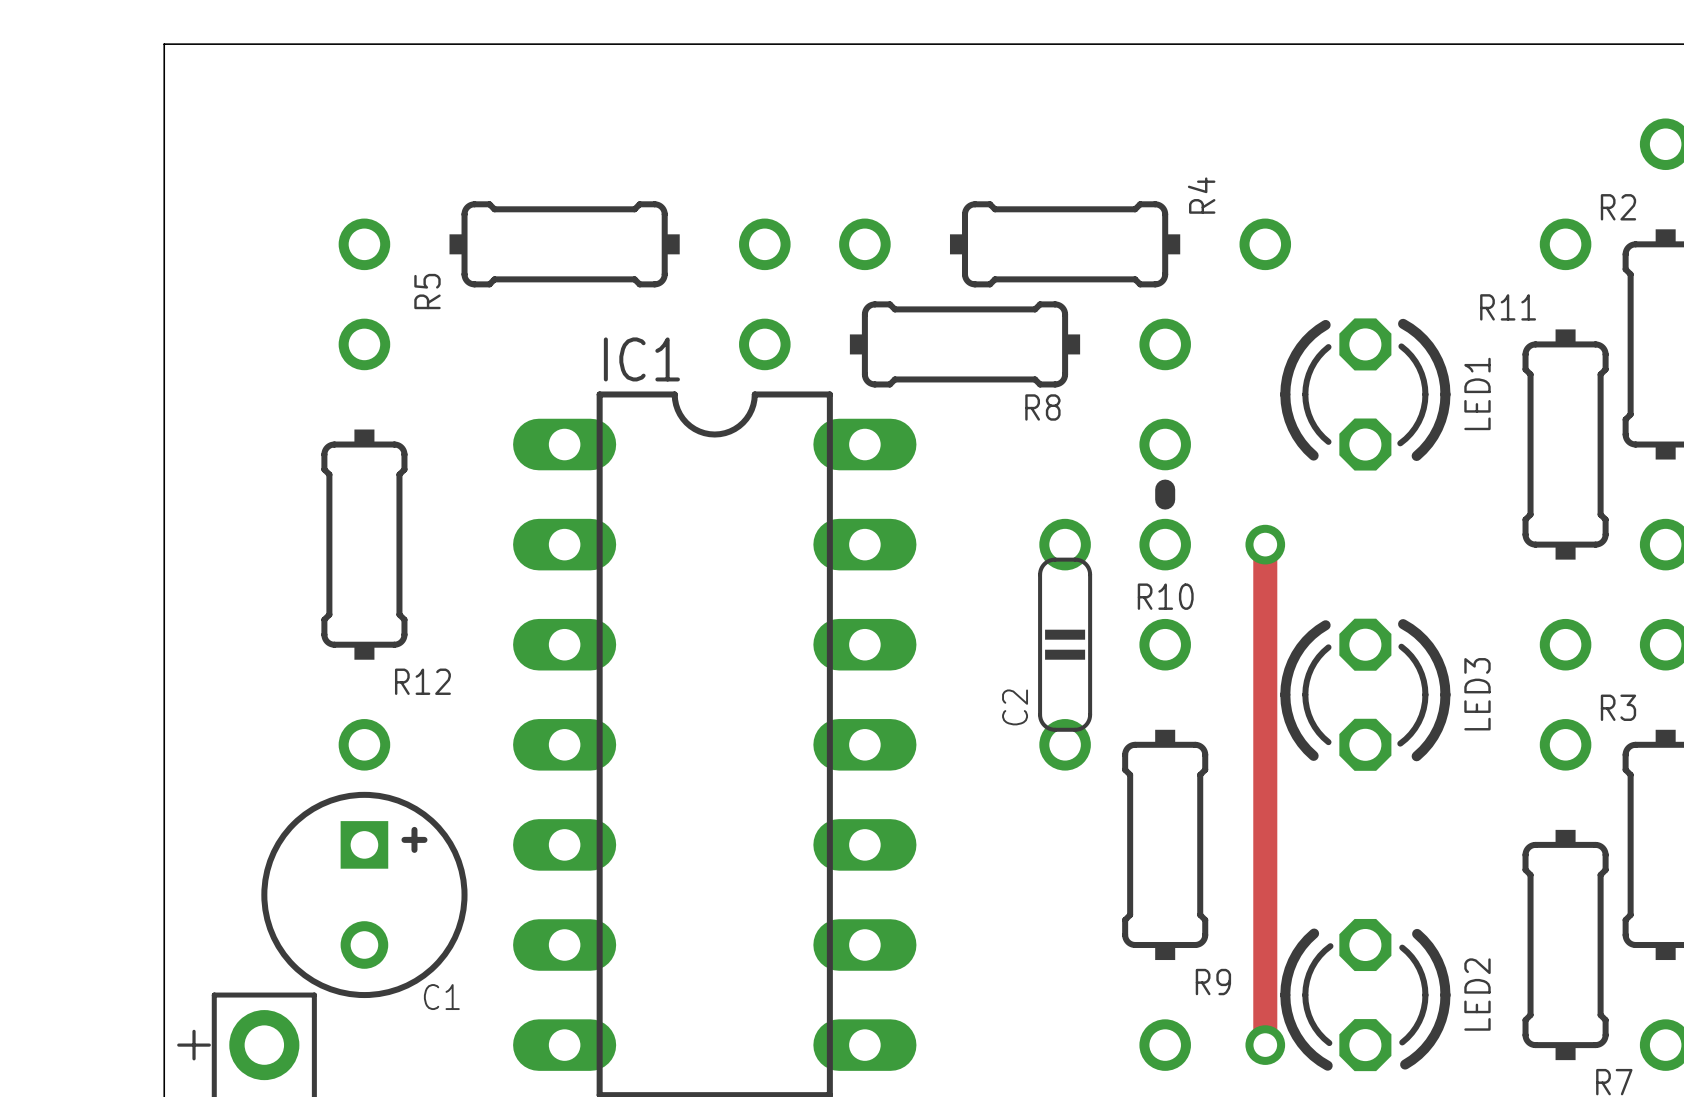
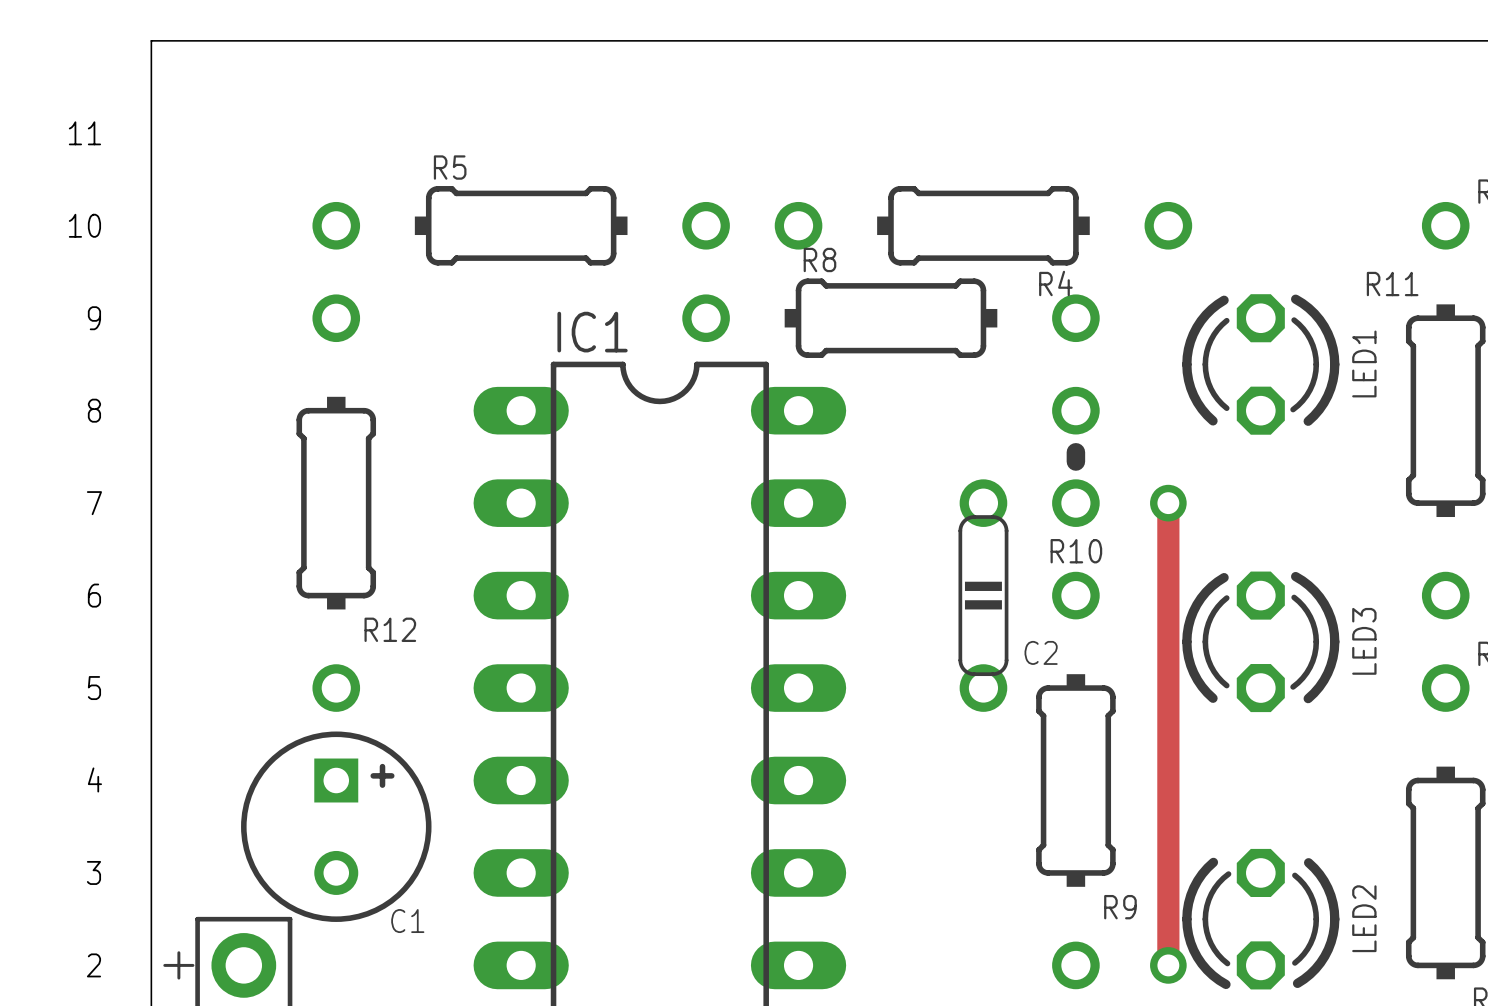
text: none -> 11 (84, 133)
R4 name rotation: 0° (1201, 195) -> 90° clockwise (1055, 283)
R4 name position: R4 (1201, 195) -> R4 (1055, 283)
text: none -> 10 (84, 225)
R5 name rotation: 0° (427, 291) -> 90° clockwise (450, 167)
R5 name position: R5 (427, 291) -> R5 (450, 167)
text: none -> 9 (94, 318)
R8 name position: R8 (1042, 407) -> R8 (819, 259)
text: none -> 8 (94, 410)
text: none -> 7 (94, 503)
text: none -> 6 (94, 595)
C2 name rotation: 0° (1015, 707) -> 90° clockwise (1041, 652)
C2 name position: C2 (1015, 707) -> C2 (1041, 652)
text: none -> 5 (94, 688)
text: none -> 4 (94, 779)
text: none -> 3 (93, 872)
text: none -> 2 (93, 965)

